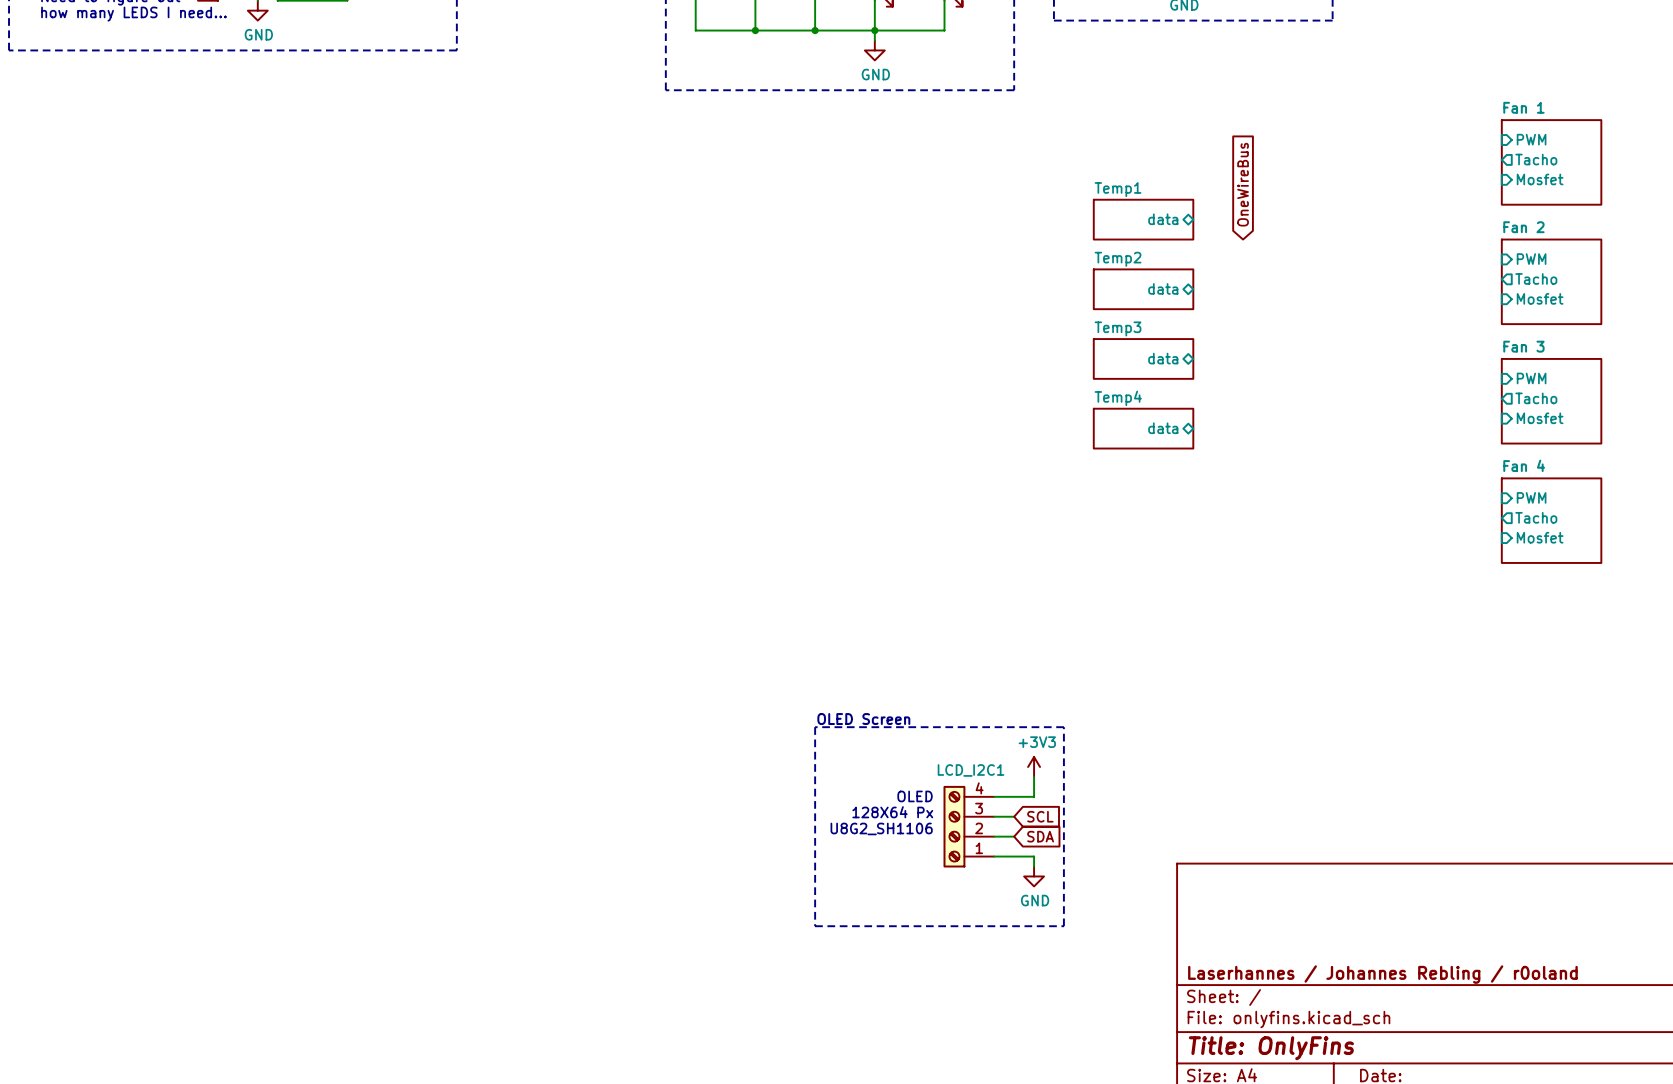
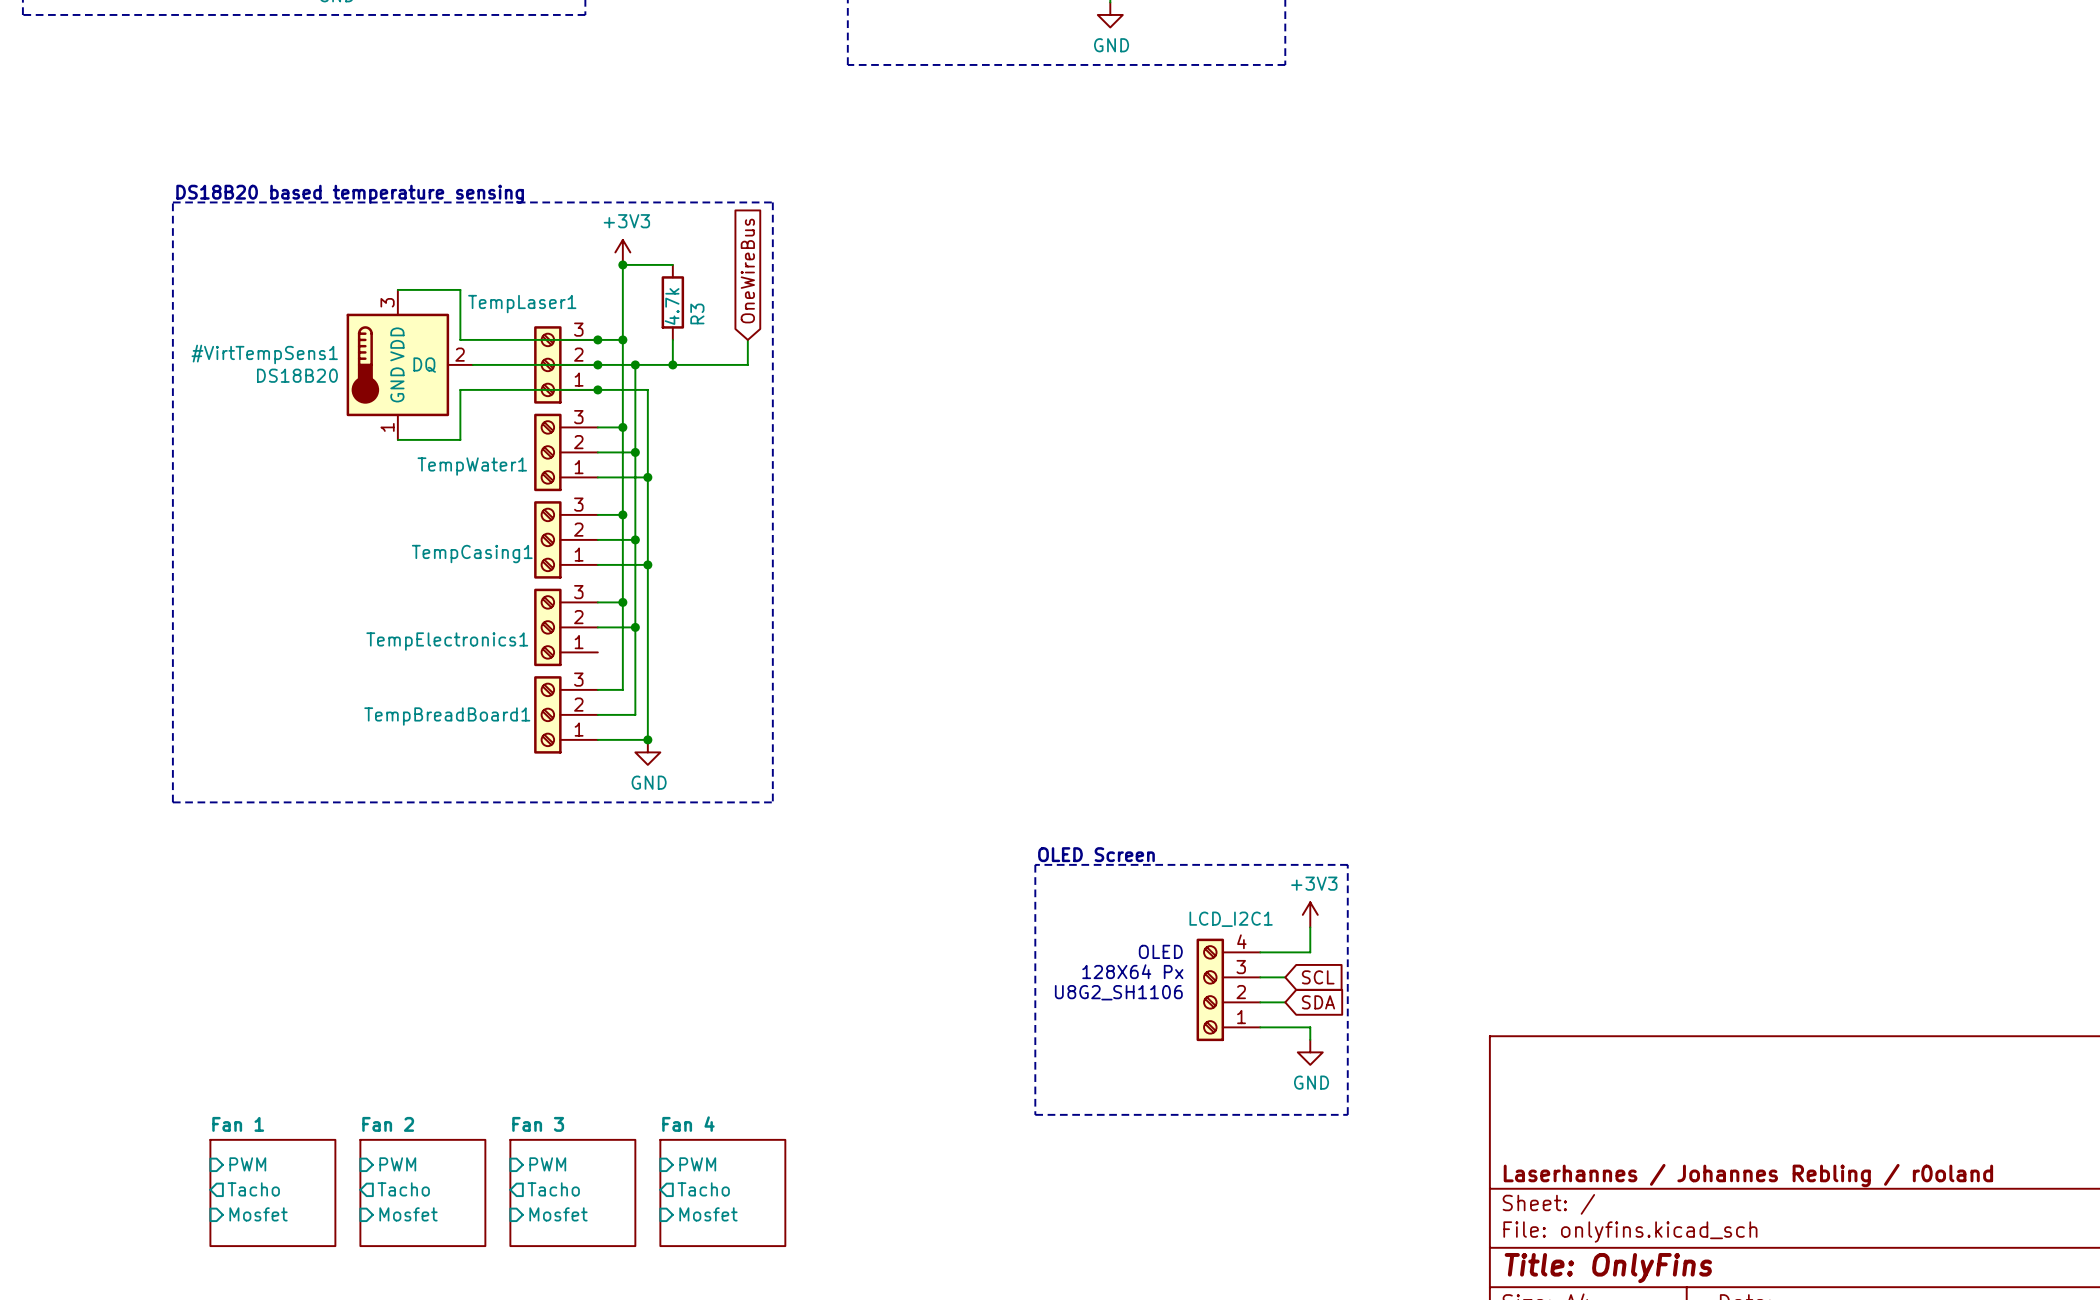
sheet pin: PWM (1531, 139) -> none
sheet pin: Tacho (1536, 159) -> none
sheet Fan 1 position: (1551, 162) -> (272, 1192)
sheet pin: Mosfet (1540, 179) -> none
global label: OneWireBus (1243, 184) -> none
text: none -> DS18B20 based temperature sensing (350, 194)
line: none -> (172, 202) (772, 202) (772, 802) (172, 802) (172, 202)
sheet Temp1: (1143, 219) -> none
sheet pin: data (1163, 219) -> none
power symbol: none -> +3V3 (622, 252)
junction: none -> (622, 264)
wire: none -> (672, 264) (622, 264) (622, 689) (597, 689)
global label: none -> OneWireBus (747, 271)
sheet pin: PWM (1531, 259) -> none
wire: none -> (397, 289) (460, 289) (460, 339) (622, 339)
sheet pin: Tacho (1536, 278) -> none
R3: none -> 4.7k (672, 302)
sheet Fan 2 position: (1551, 281) -> (422, 1192)
sheet pin: data (1163, 288) -> none
sheet Temp2: (1143, 289) -> none
sheet pin: Mosfet (1540, 298) -> none
junction: none -> (597, 339)
junction: none -> (622, 339)
wire: none -> (672, 339) (672, 364)
wire: none -> (747, 339) (747, 364) (472, 364)
#VirtTempSens1: none -> DS18B20 (409, 364)
TempLaser1: none -> (565, 364)
junction: none -> (597, 364)
wire: none -> (635, 364) (635, 714) (597, 714)
junction: none -> (635, 364)
junction: none -> (672, 364)
junction: none -> (597, 389)
sheet Temp3: (1143, 358) -> none
sheet pin: data (1163, 358) -> none
wire: none -> (597, 427) (622, 427)
junction: none -> (622, 427)
sheet pin: PWM (1531, 378) -> none
wire: none -> (397, 439) (460, 439) (460, 389) (647, 389) (647, 739) (597, 739)
TempWater1: none -> (565, 452)
wire: none -> (597, 452) (635, 452)
junction: none -> (635, 452)
sheet pin: Tacho (1536, 398) -> none
sheet Fan 3 position: (1551, 401) -> (572, 1192)
wire: none -> (597, 477) (647, 477)
junction: none -> (647, 477)
sheet pin: Mosfet (1540, 418) -> none
sheet Temp4: (1143, 428) -> none
sheet pin: data (1163, 428) -> none
wire: none -> (597, 514) (622, 514)
junction: none -> (622, 514)
TempCasing1: none -> (565, 539)
wire: none -> (597, 539) (635, 539)
junction: none -> (635, 539)
wire: none -> (597, 564) (647, 564)
junction: none -> (647, 564)
sheet pin: PWM (1531, 497) -> none
sheet pin: Tacho (1536, 517) -> none
wire: none -> (597, 602) (622, 602)
junction: none -> (622, 602)
sheet Fan 4 position: (1551, 520) -> (722, 1192)
sheet pin: Mosfet (1540, 537) -> none
TempElectronics1: none -> (565, 627)
wire: none -> (597, 627) (635, 627)
junction: none -> (635, 627)
TempBreadBoard1: none -> (565, 714)
junction: none -> (647, 739)
power symbol: none -> GND (647, 752)
sheet pin: none -> PWM (247, 1164)
sheet pin: none -> PWM (397, 1164)
sheet pin: none -> PWM (547, 1164)
sheet pin: none -> PWM (697, 1164)
sheet pin: none -> Tacho (253, 1189)
sheet pin: none -> Tacho (403, 1189)
sheet pin: none -> Tacho (553, 1189)
sheet pin: none -> Tacho (703, 1189)
sheet pin: none -> Mosfet (258, 1214)
sheet pin: none -> Mosfet (408, 1214)
sheet pin: none -> Mosfet (558, 1214)
sheet pin: none -> Mosfet (708, 1214)

